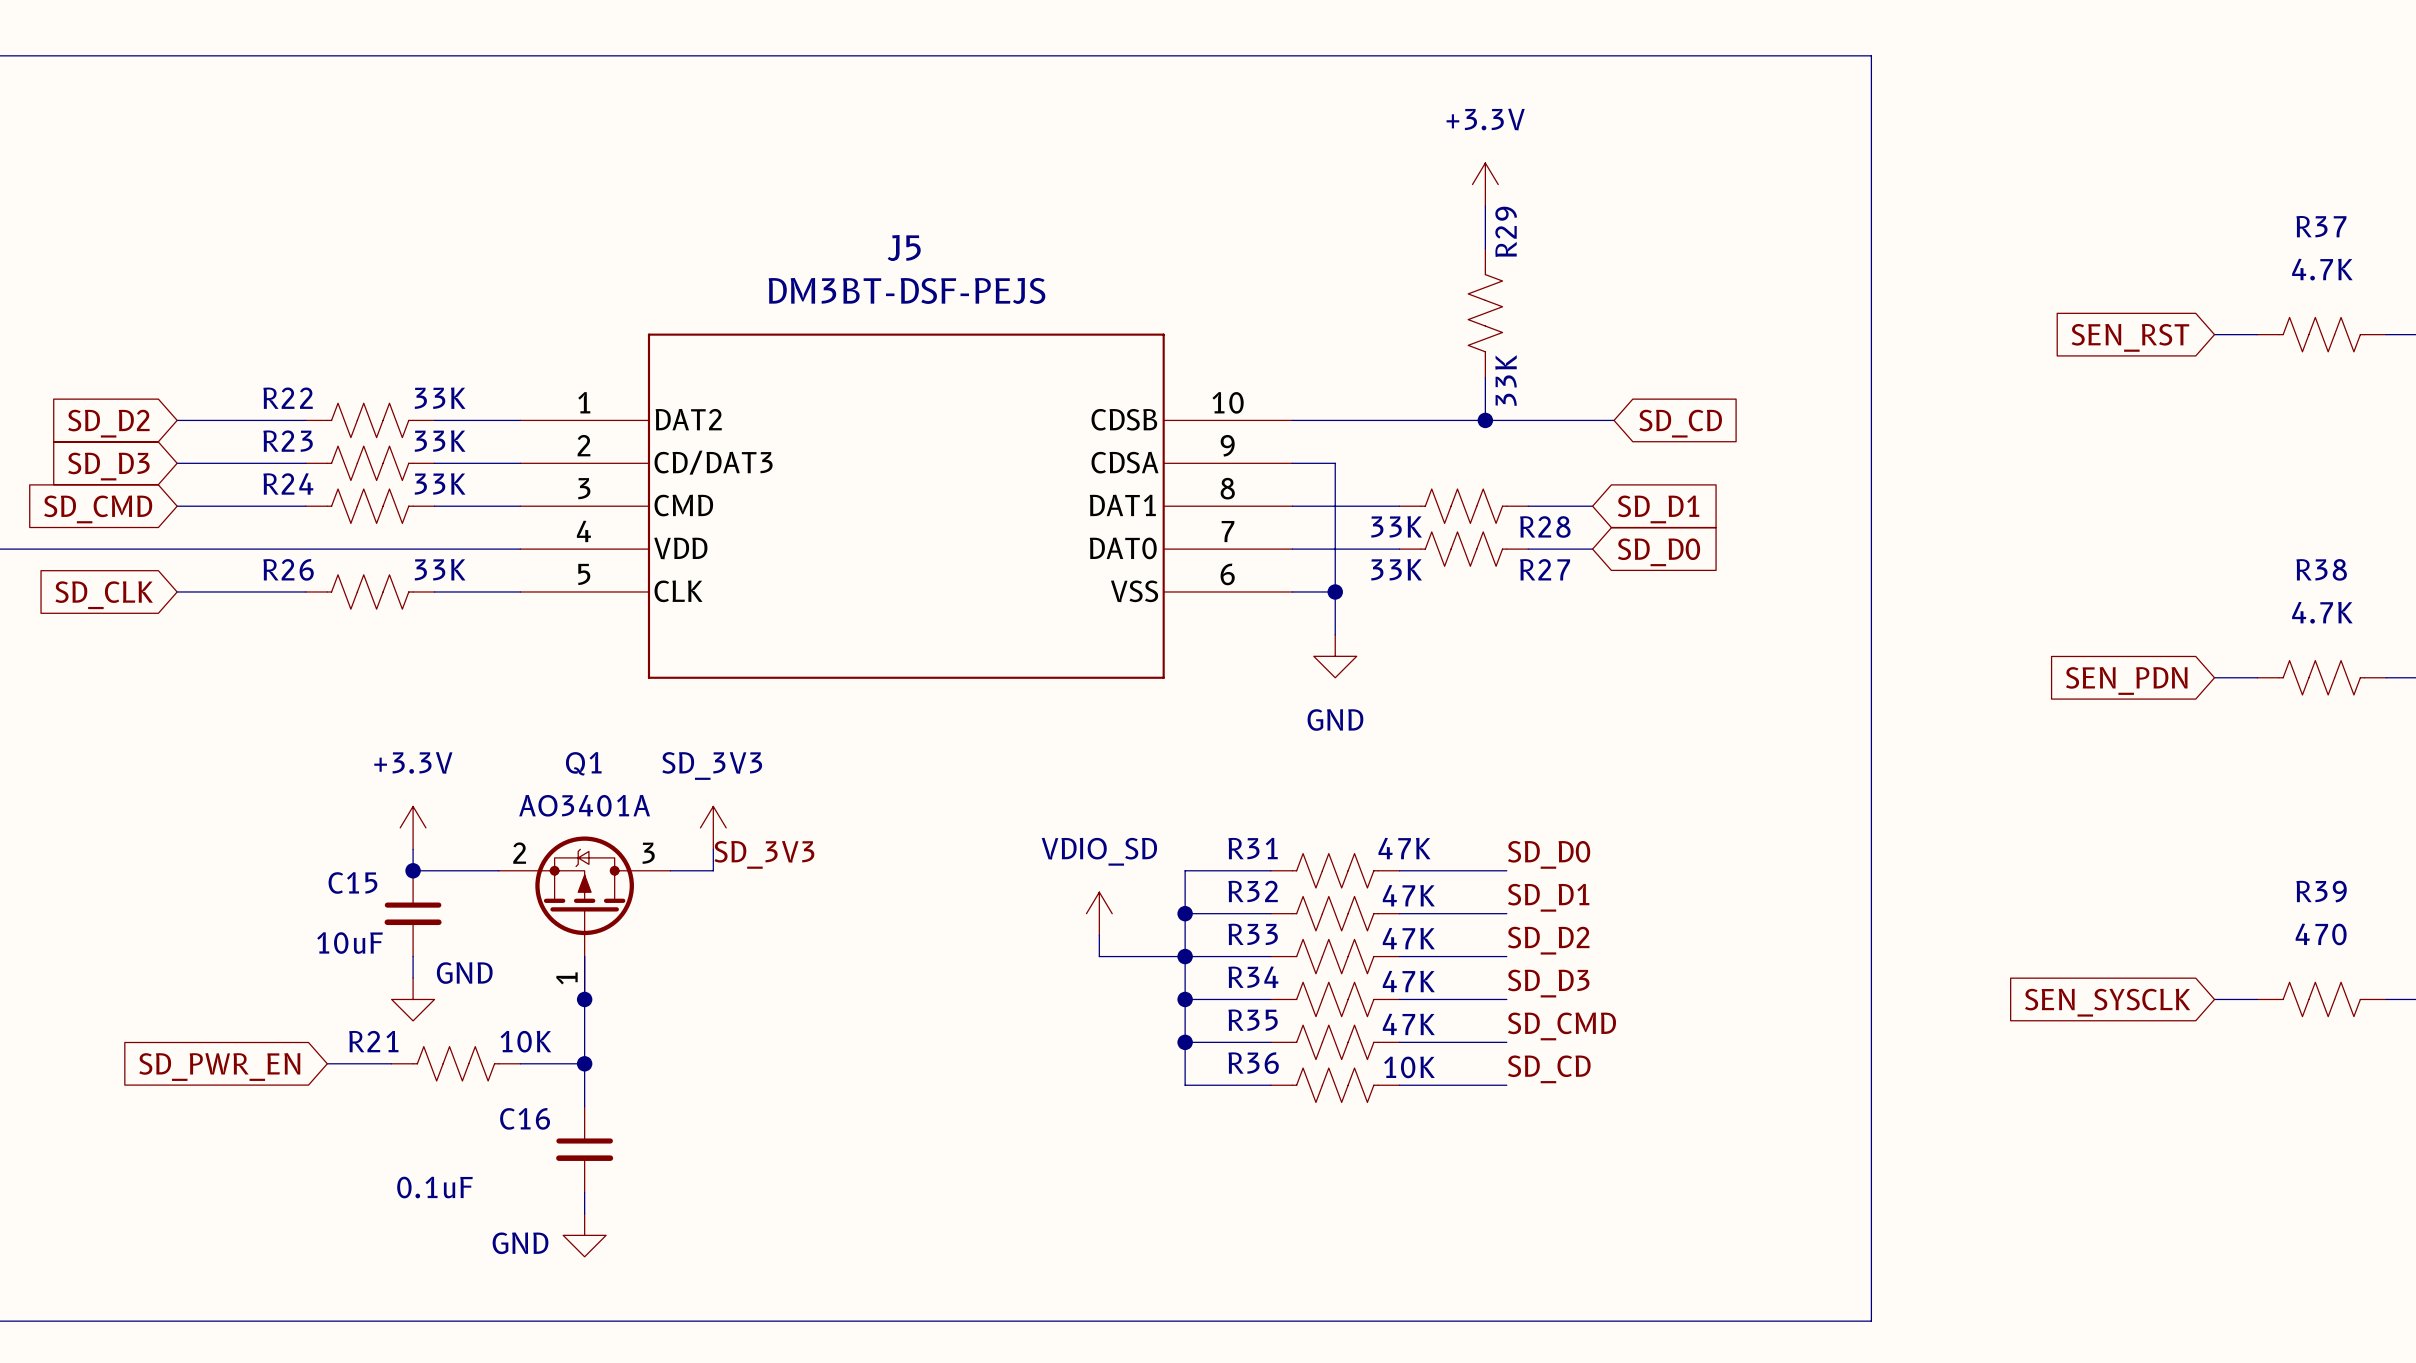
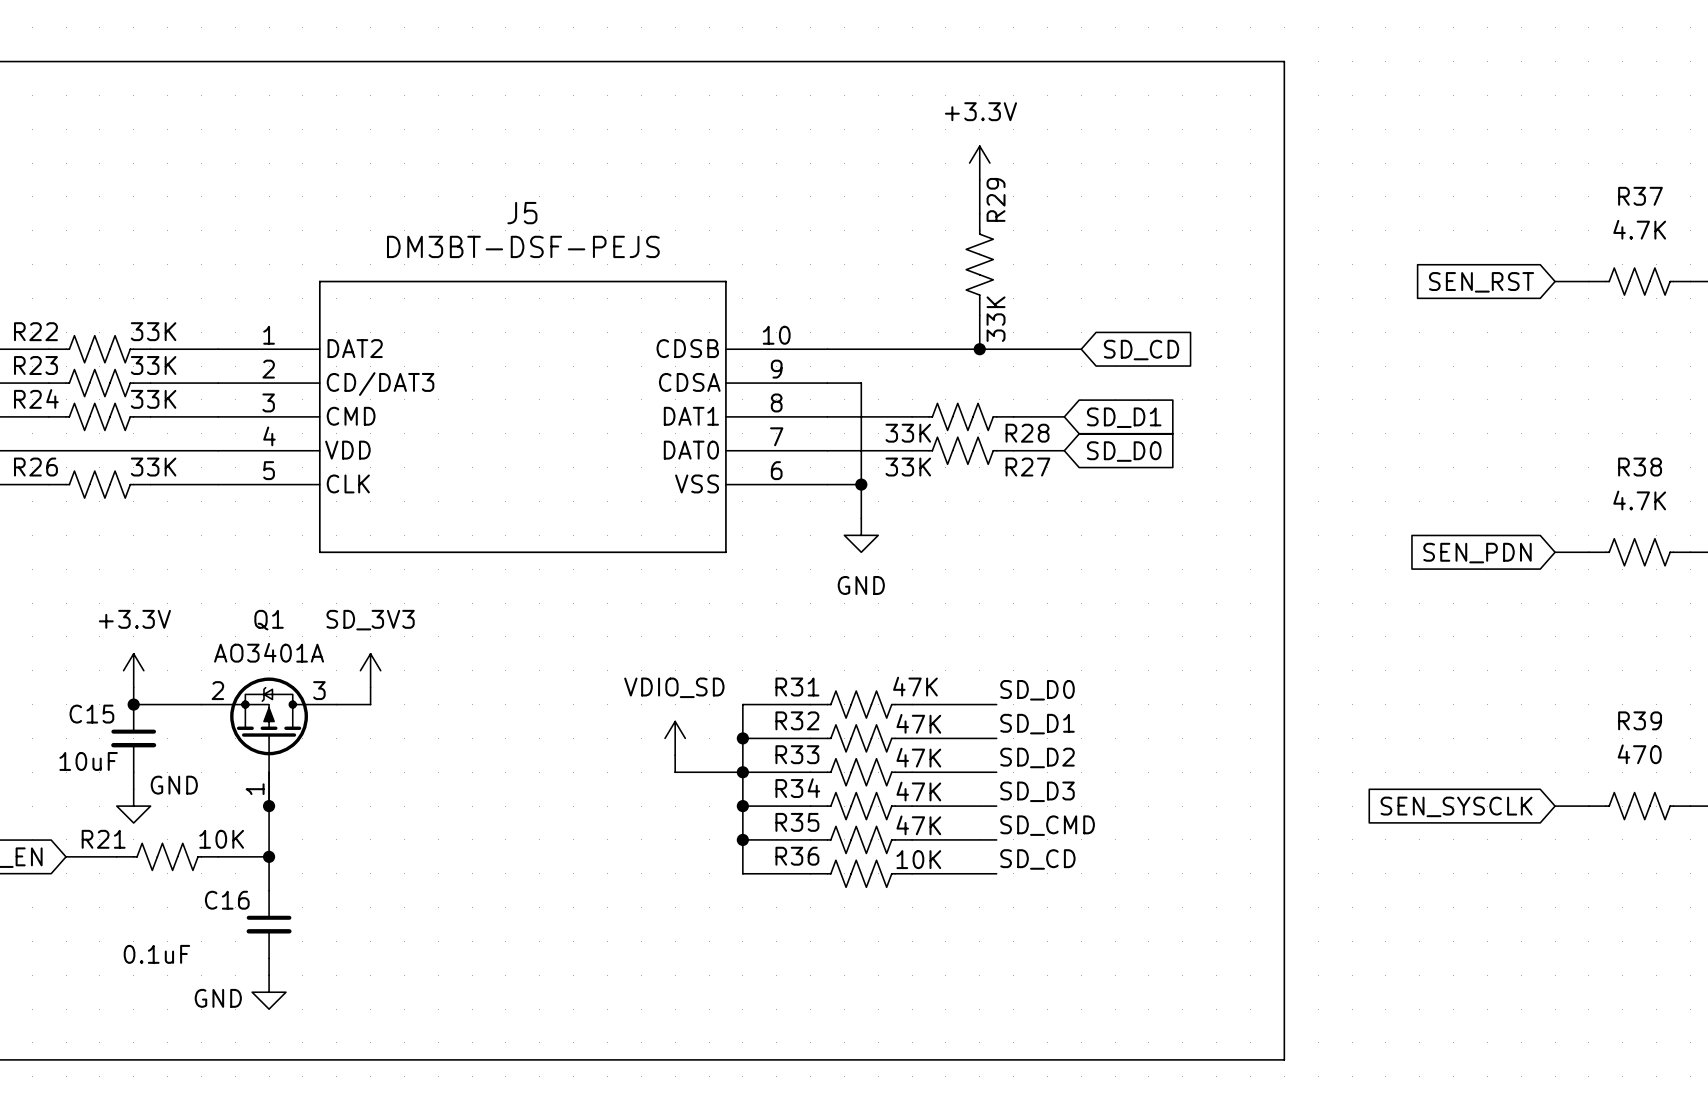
label: SD_3V3 (764, 854) -> none

